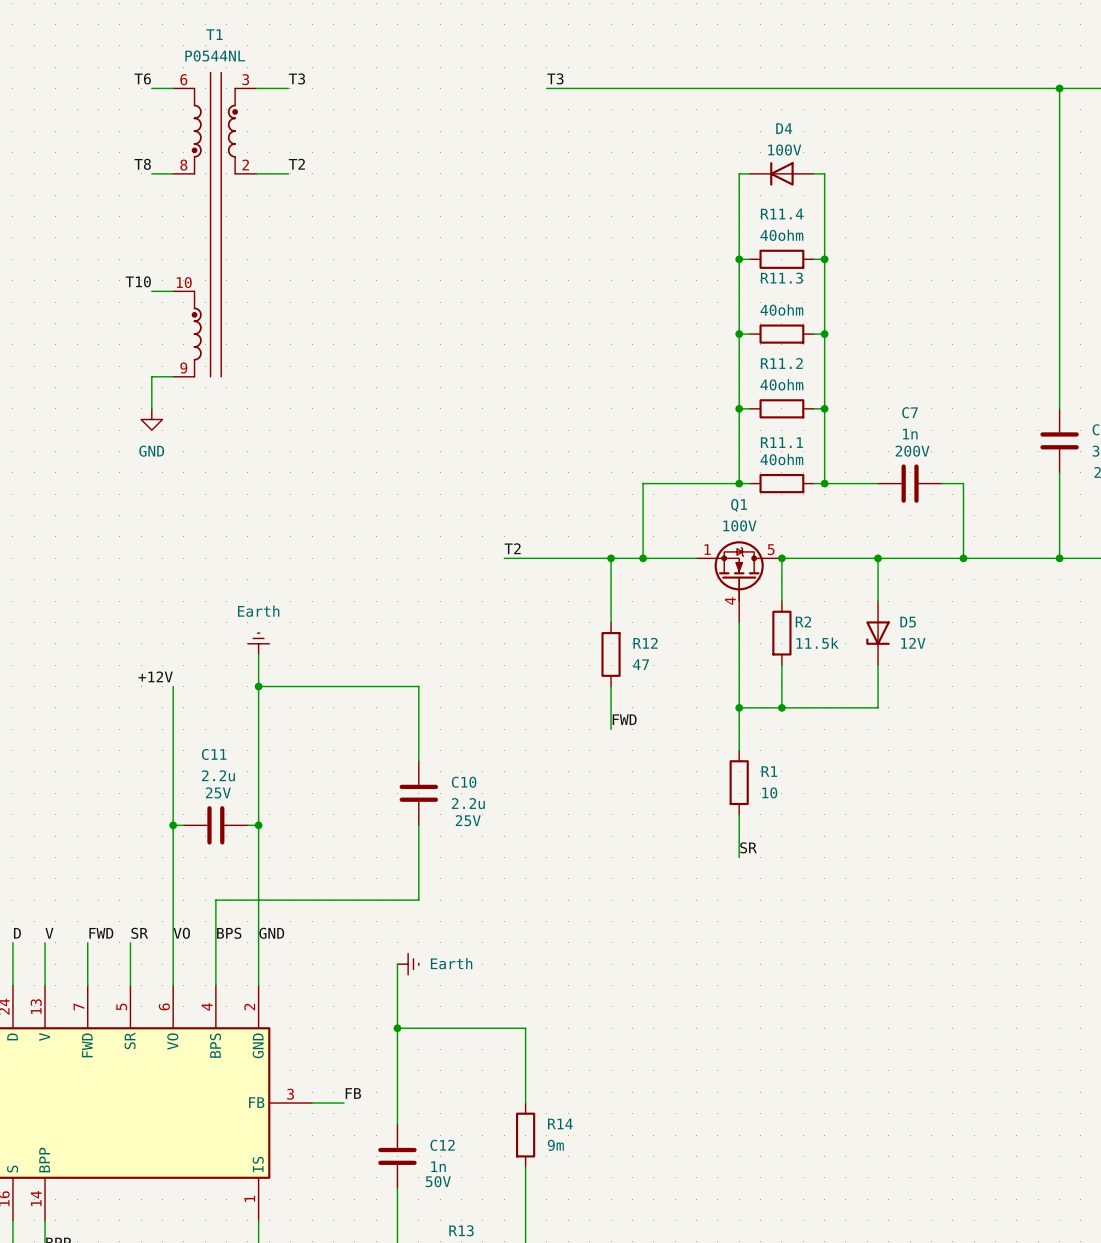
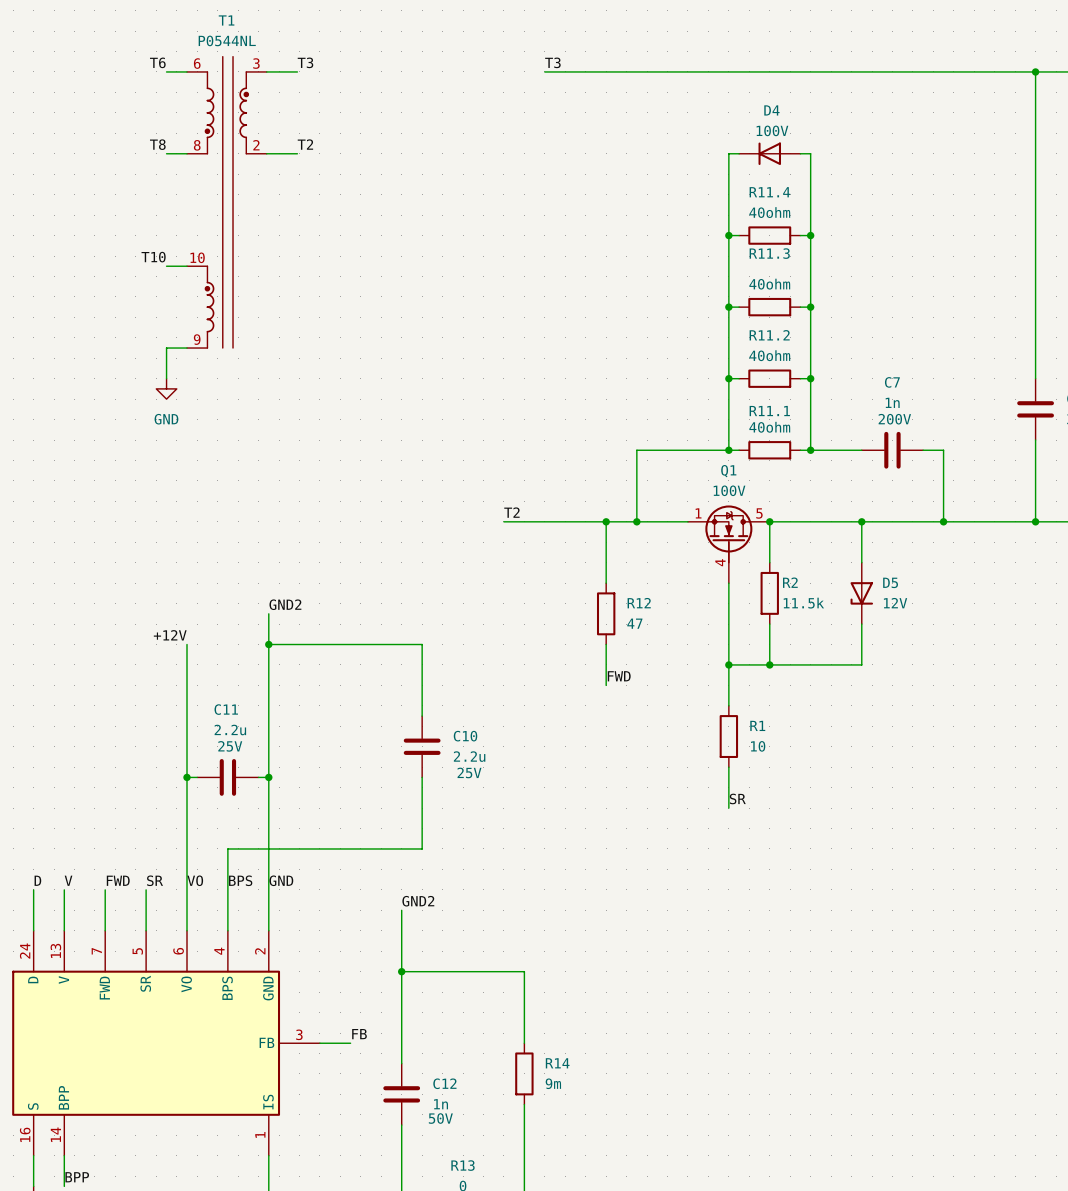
power symbol: Earth (258, 643) -> none
label: none -> GND2 (285, 604)
label: none -> GND2 (418, 901)
power symbol: Earth (408, 964) -> none

